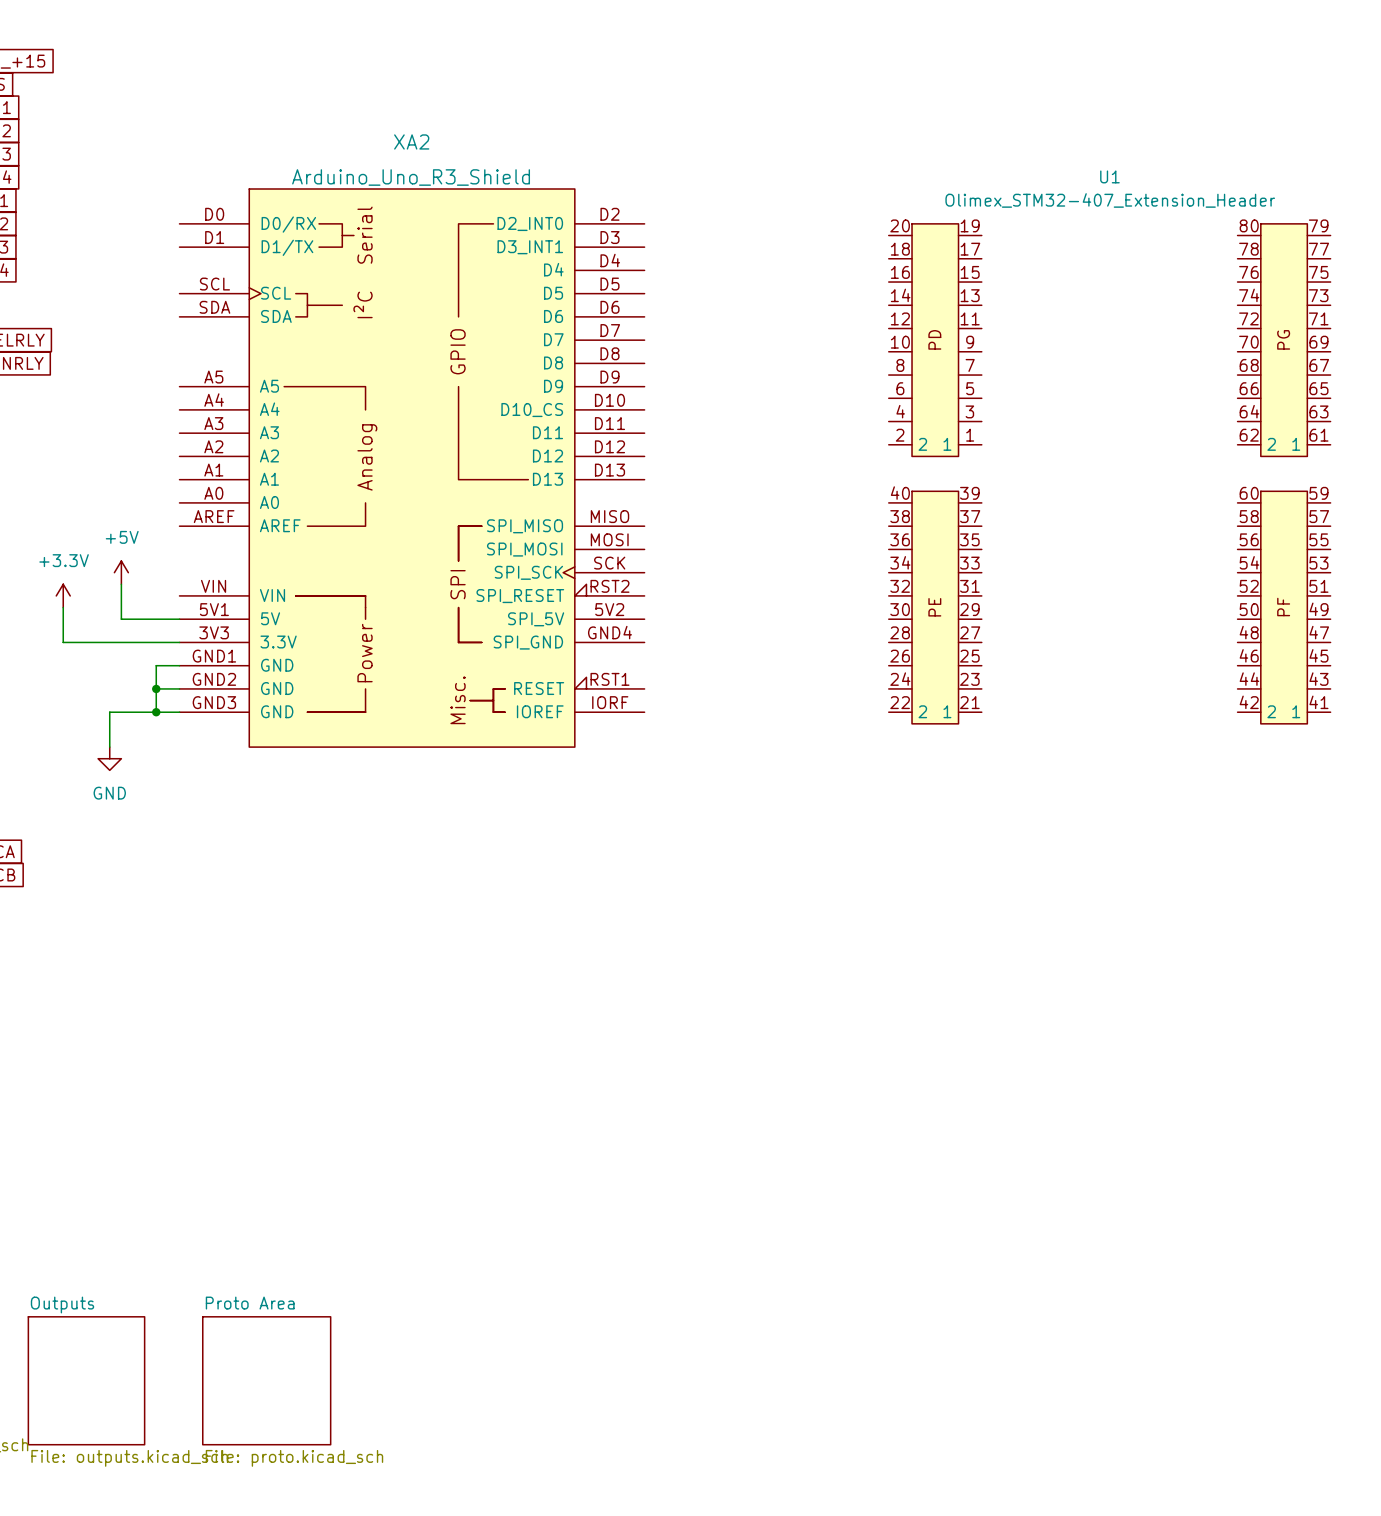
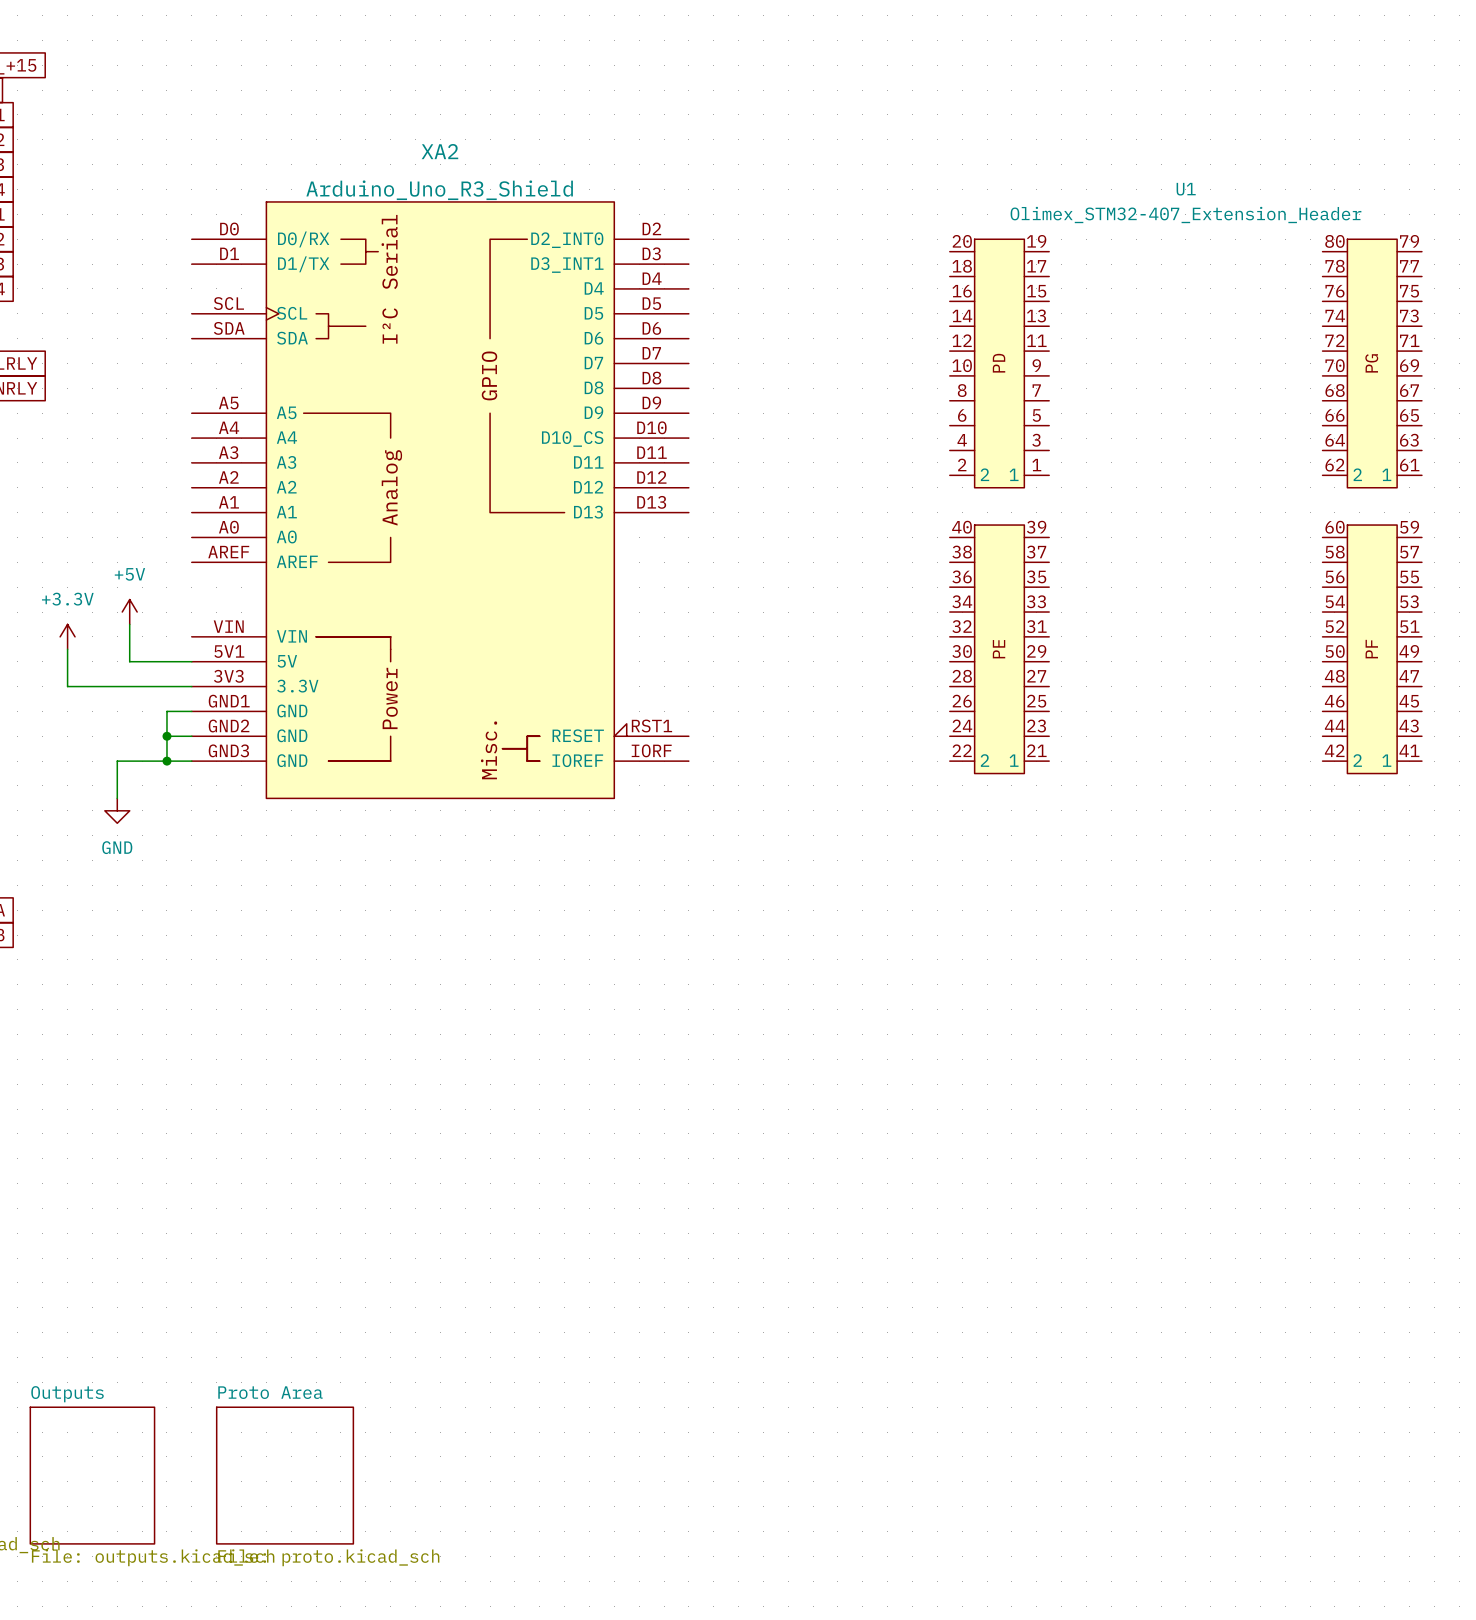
XA2 symbol: [179, 188, 645, 748] -> [191, 201, 689, 799]

